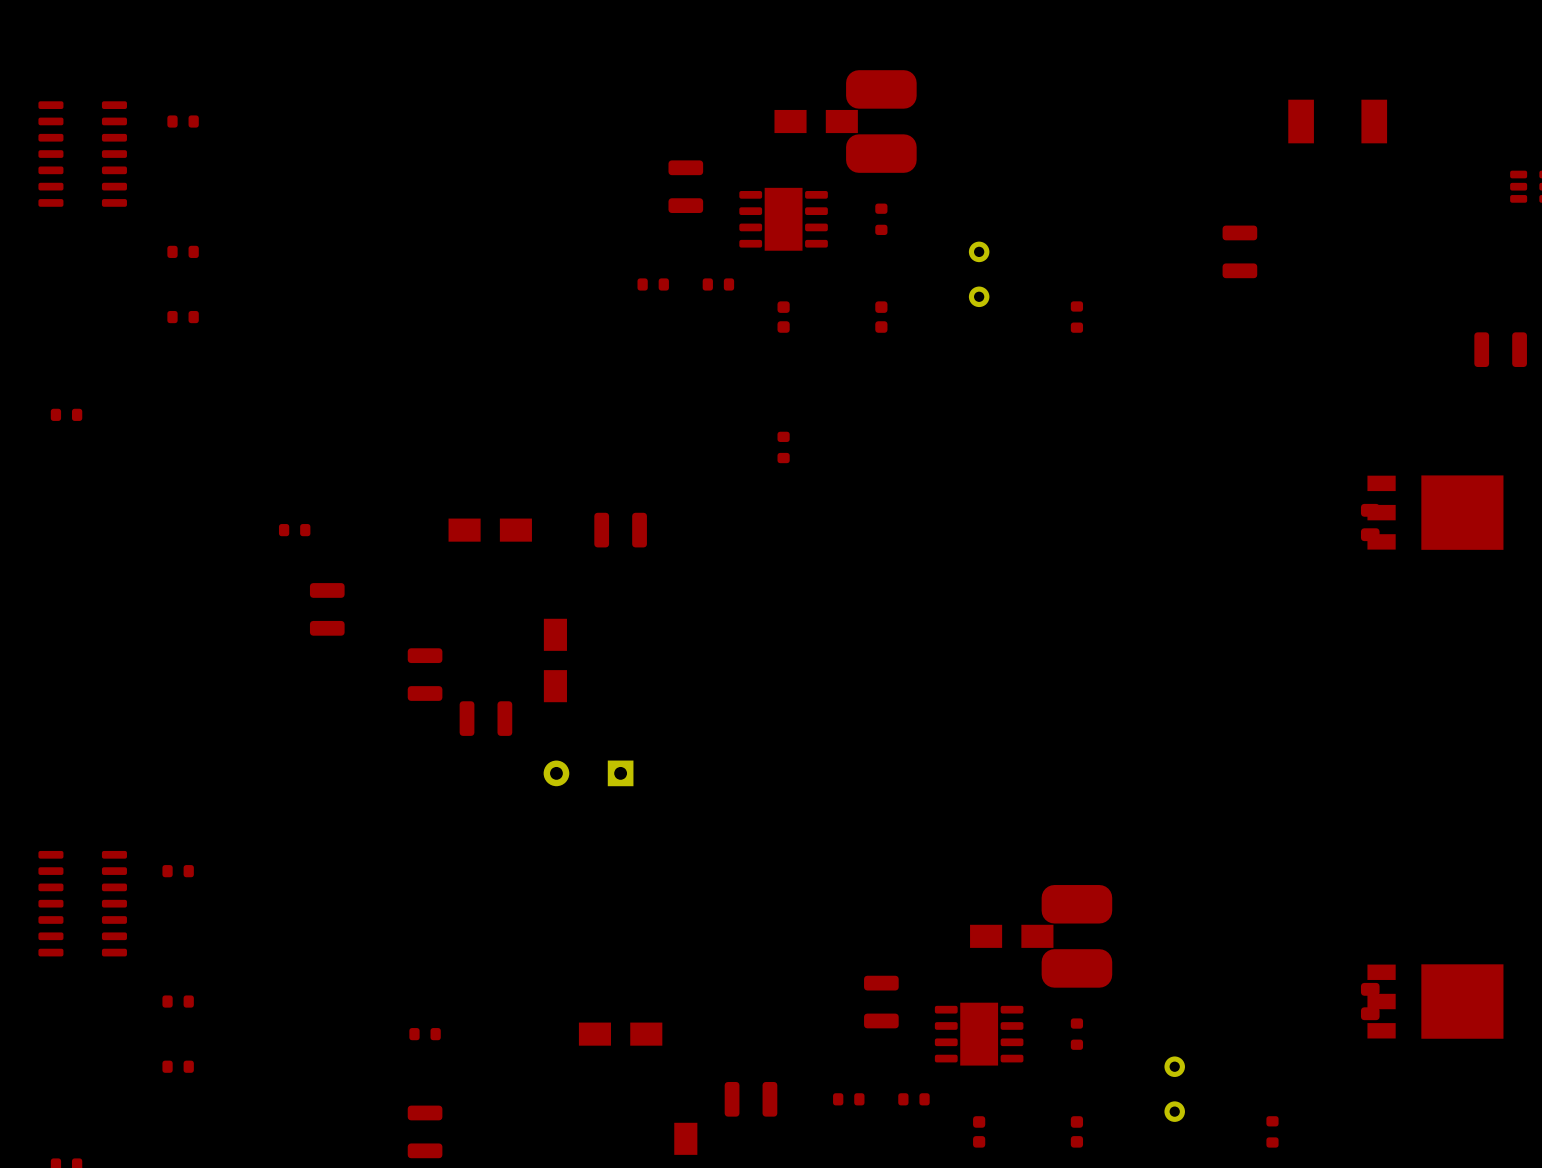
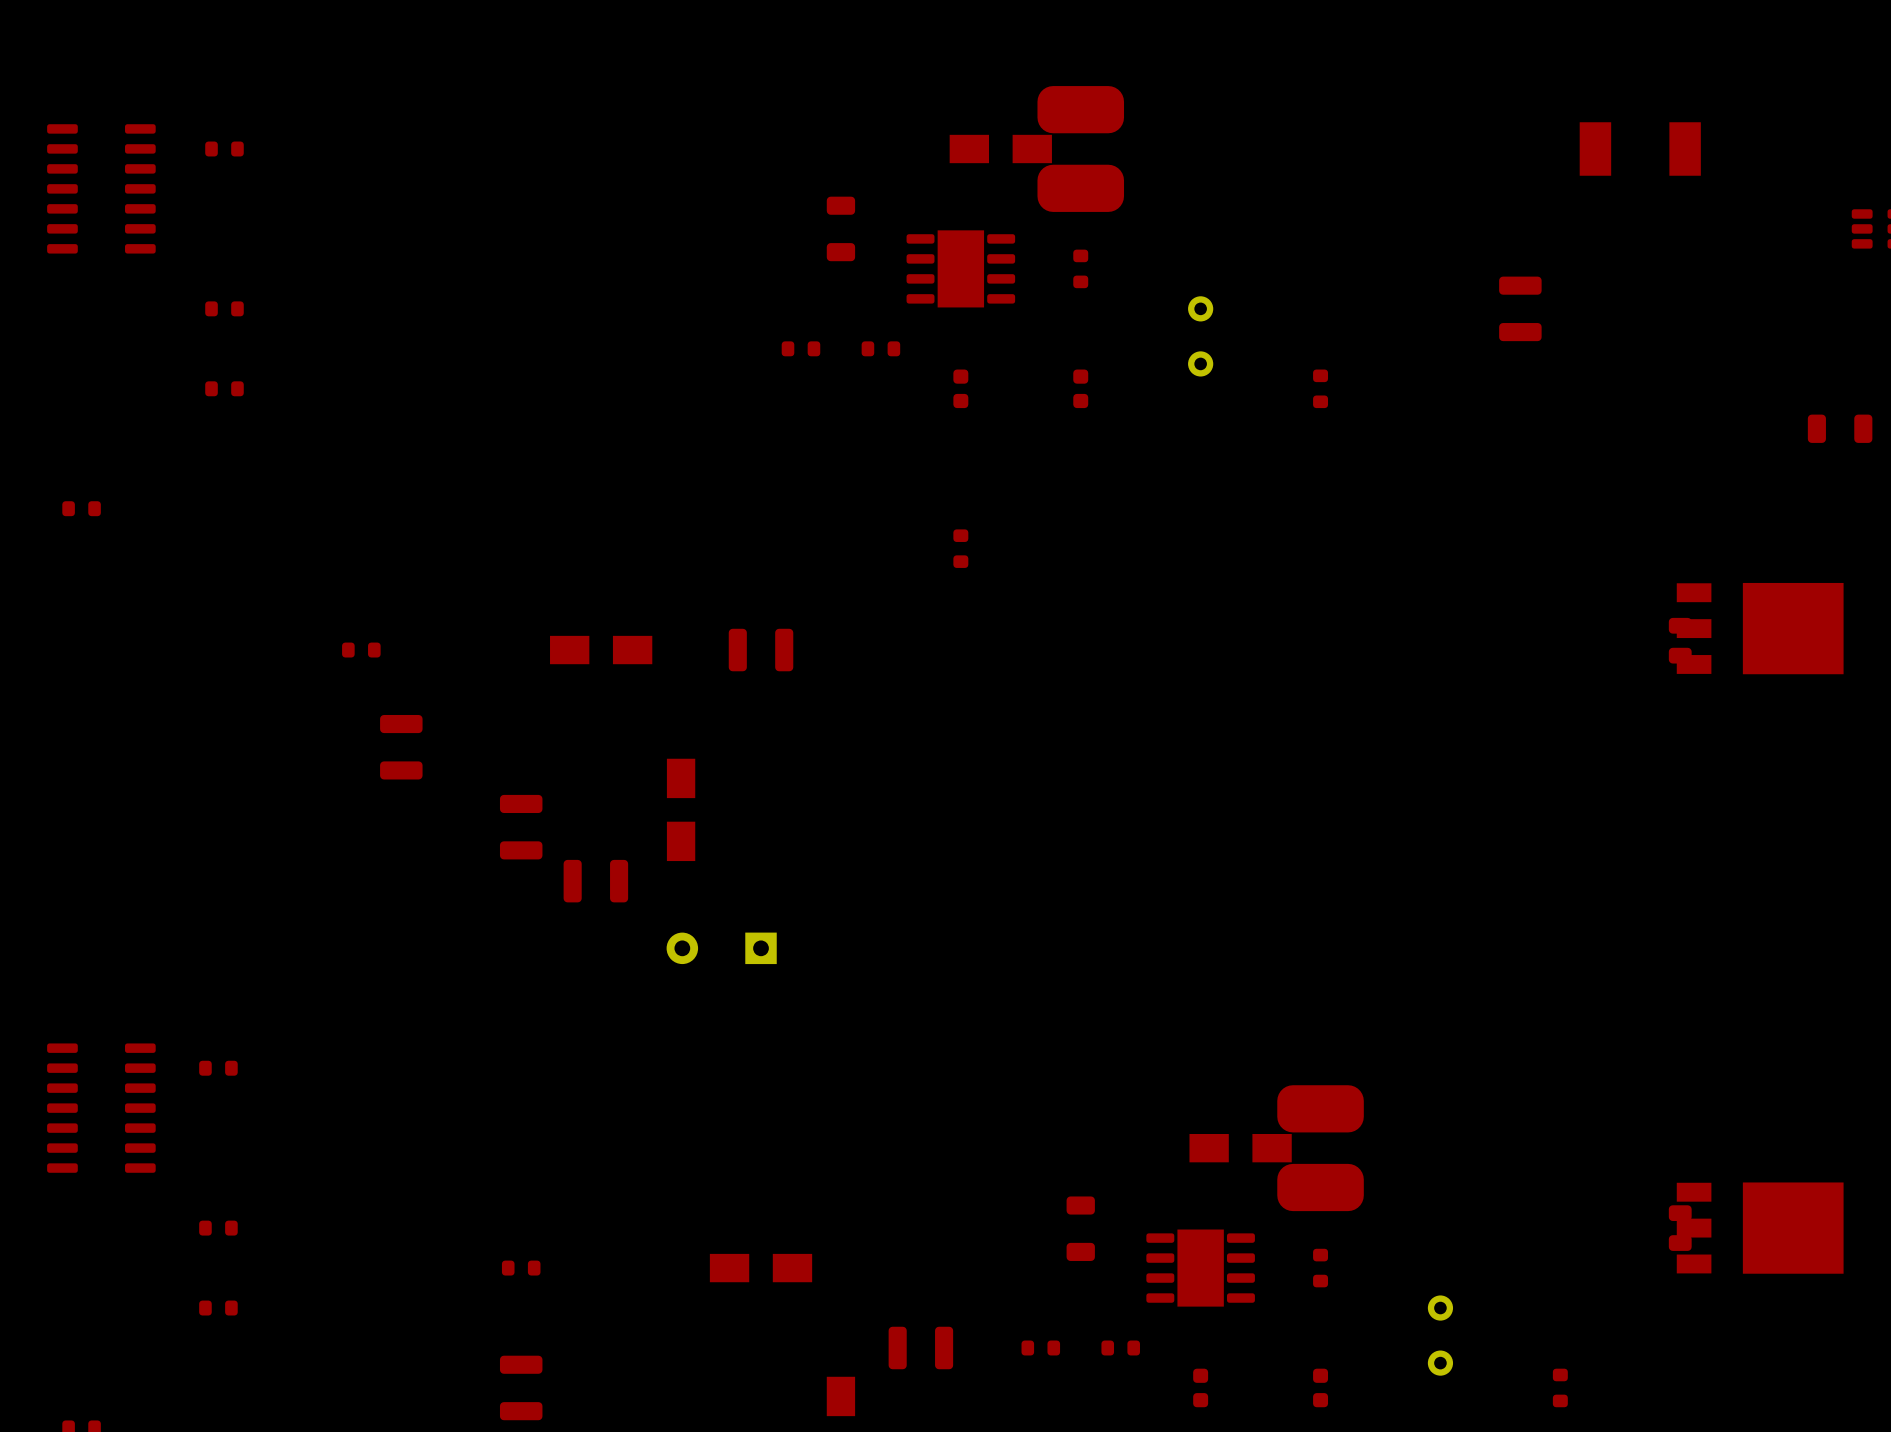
part footprint: [668, 160, 704, 214] -> [826, 196, 856, 262]
part footprint: [1474, 332, 1527, 367] -> [1807, 414, 1873, 443]
part footprint: [864, 975, 899, 1029] -> [1066, 1196, 1095, 1261]

